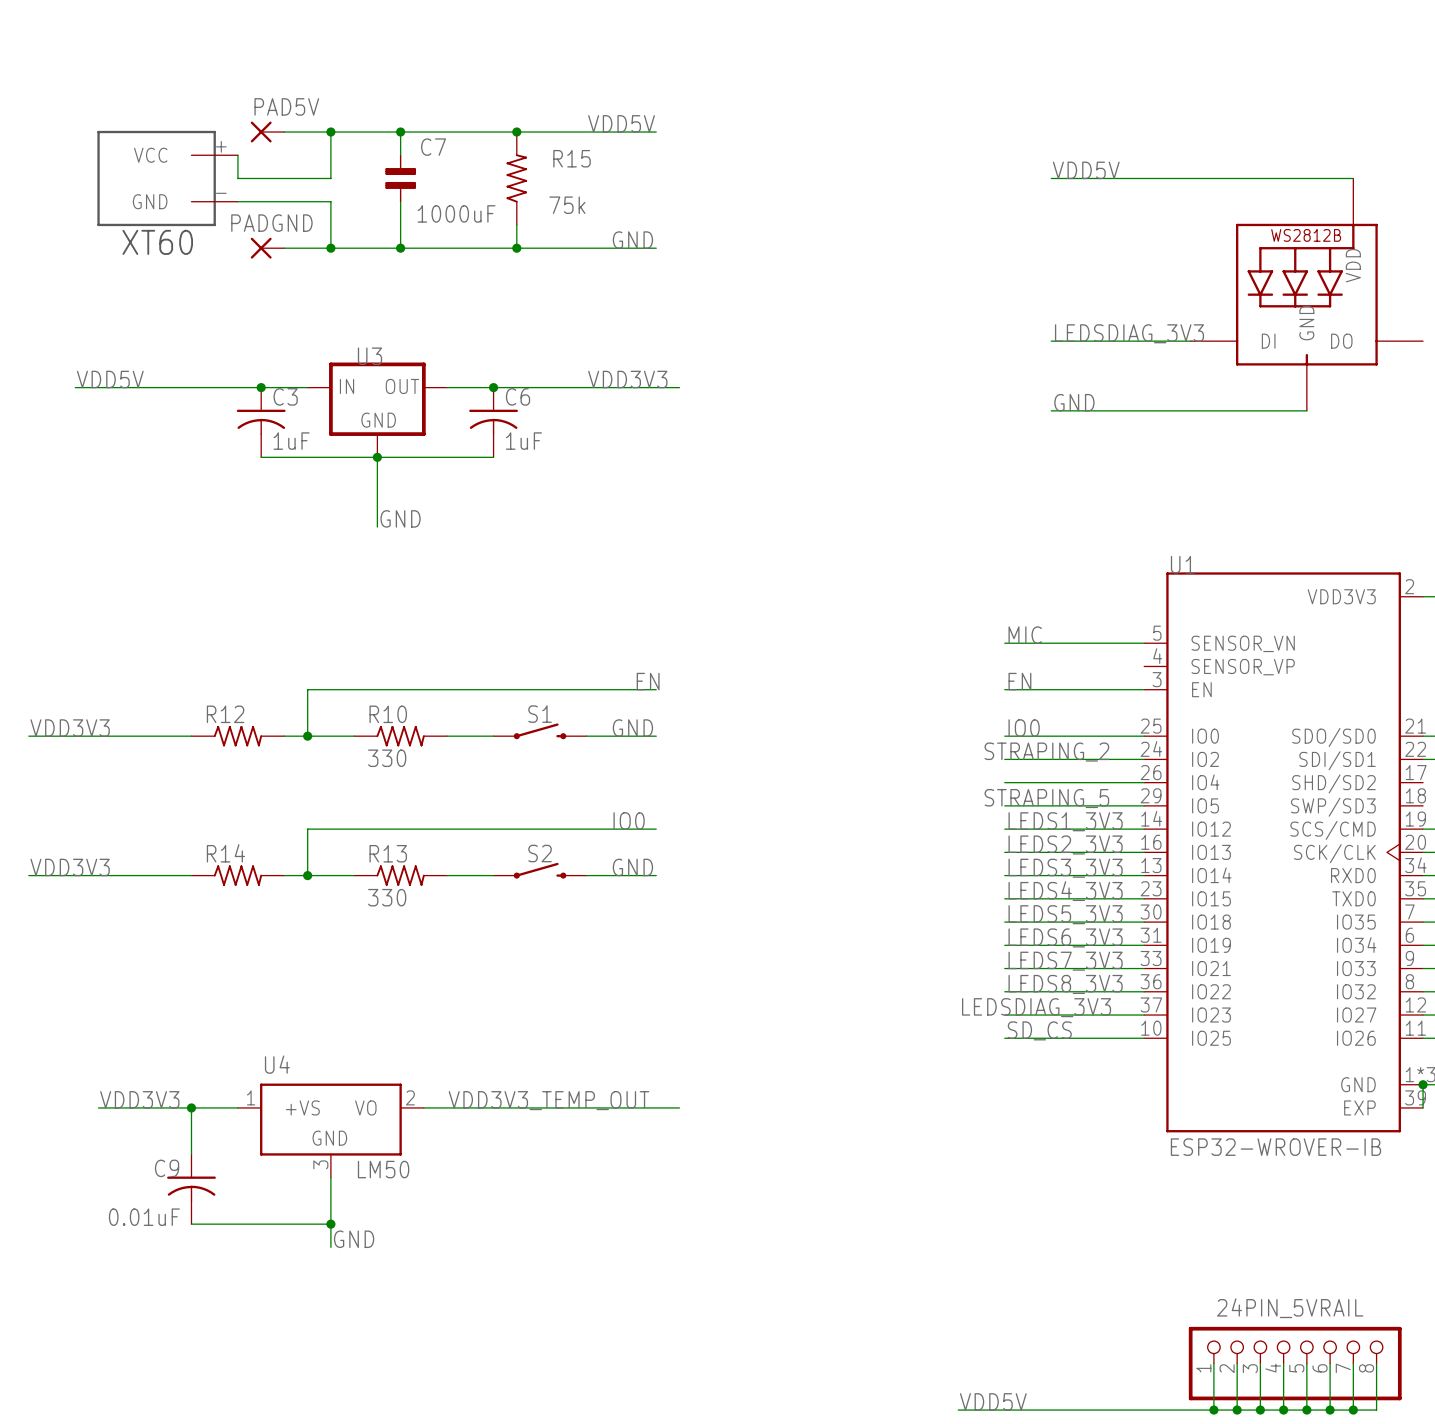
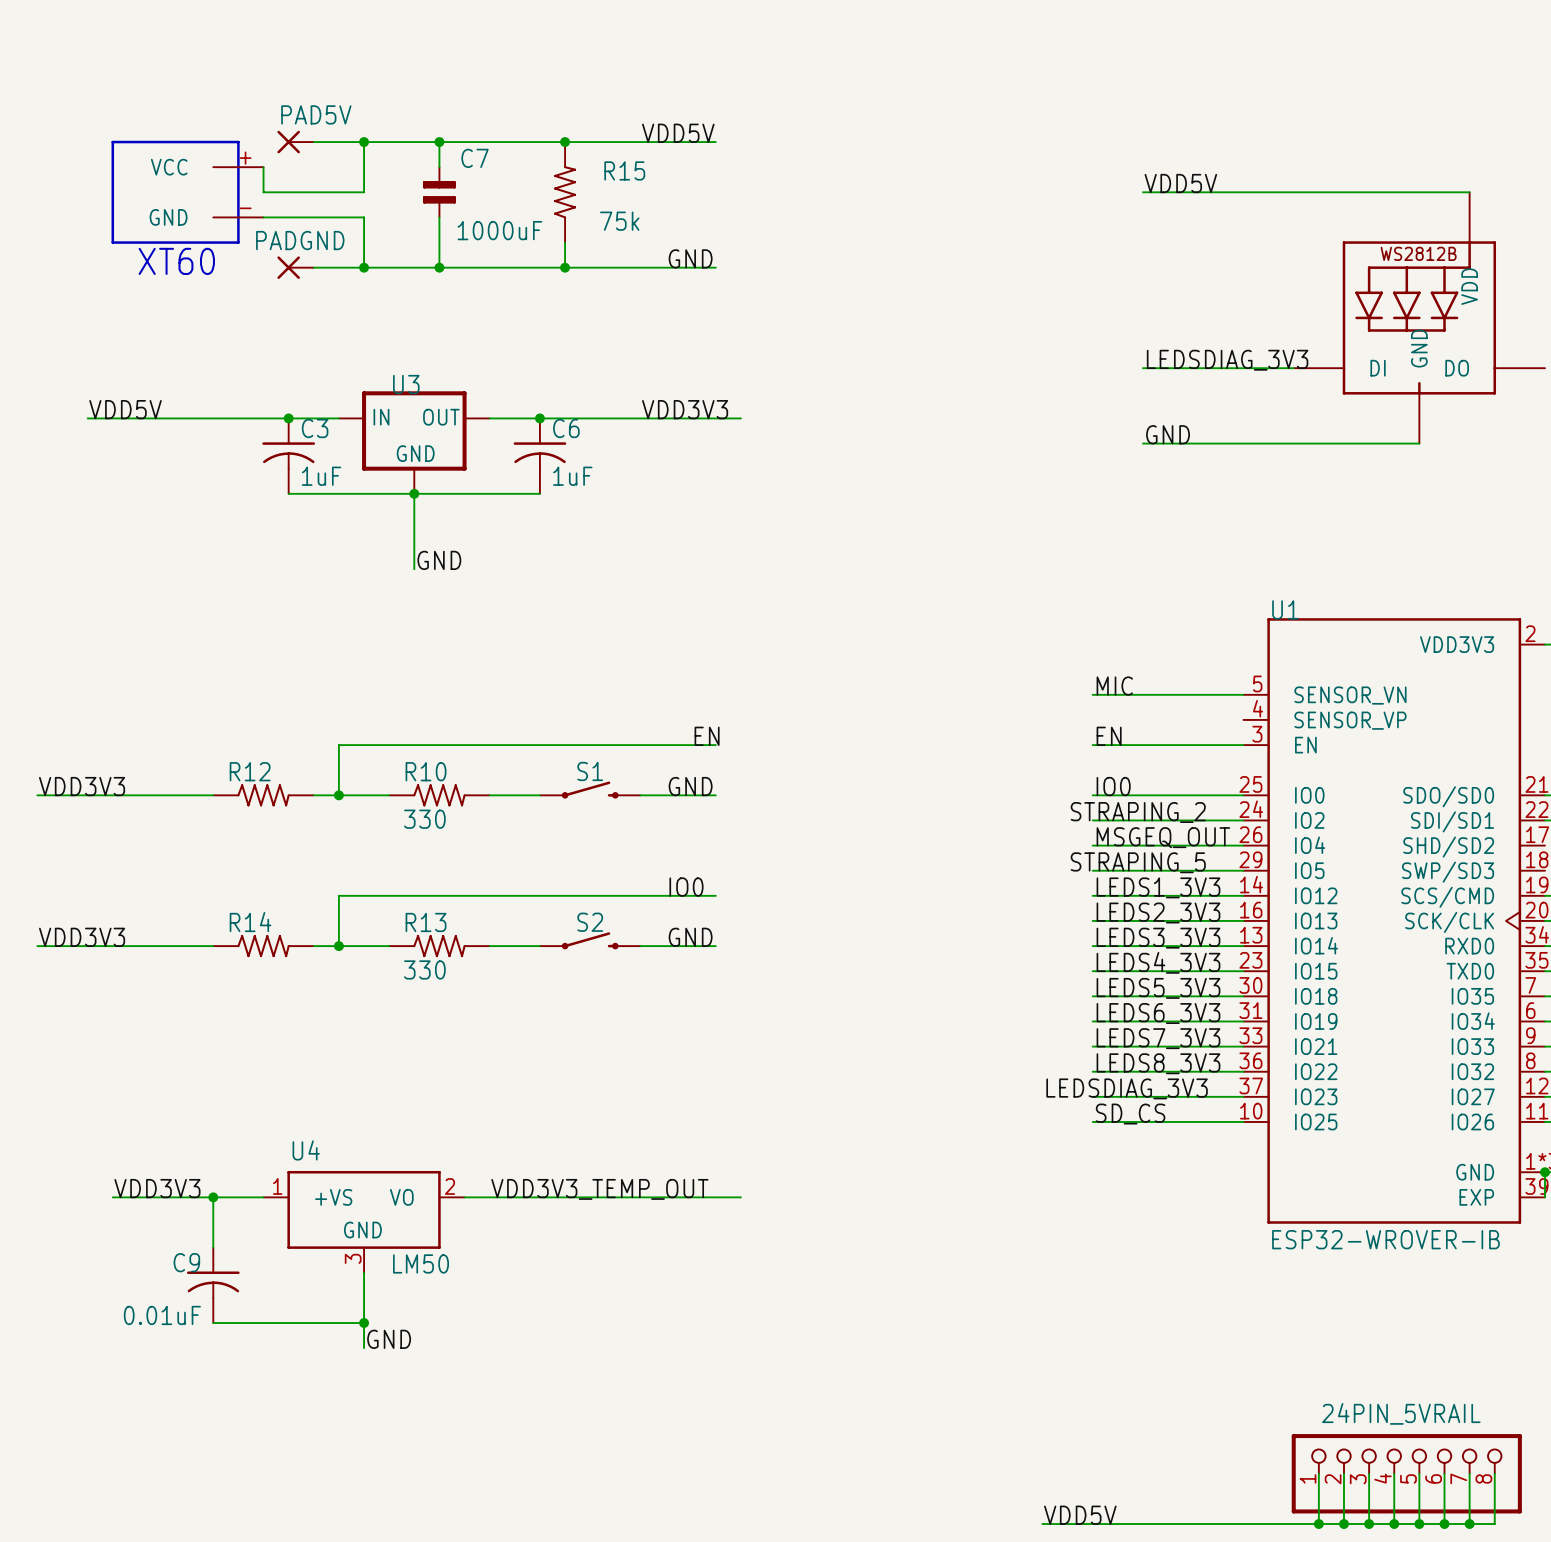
label: none -> MSGEQ_OUT (1163, 837)

